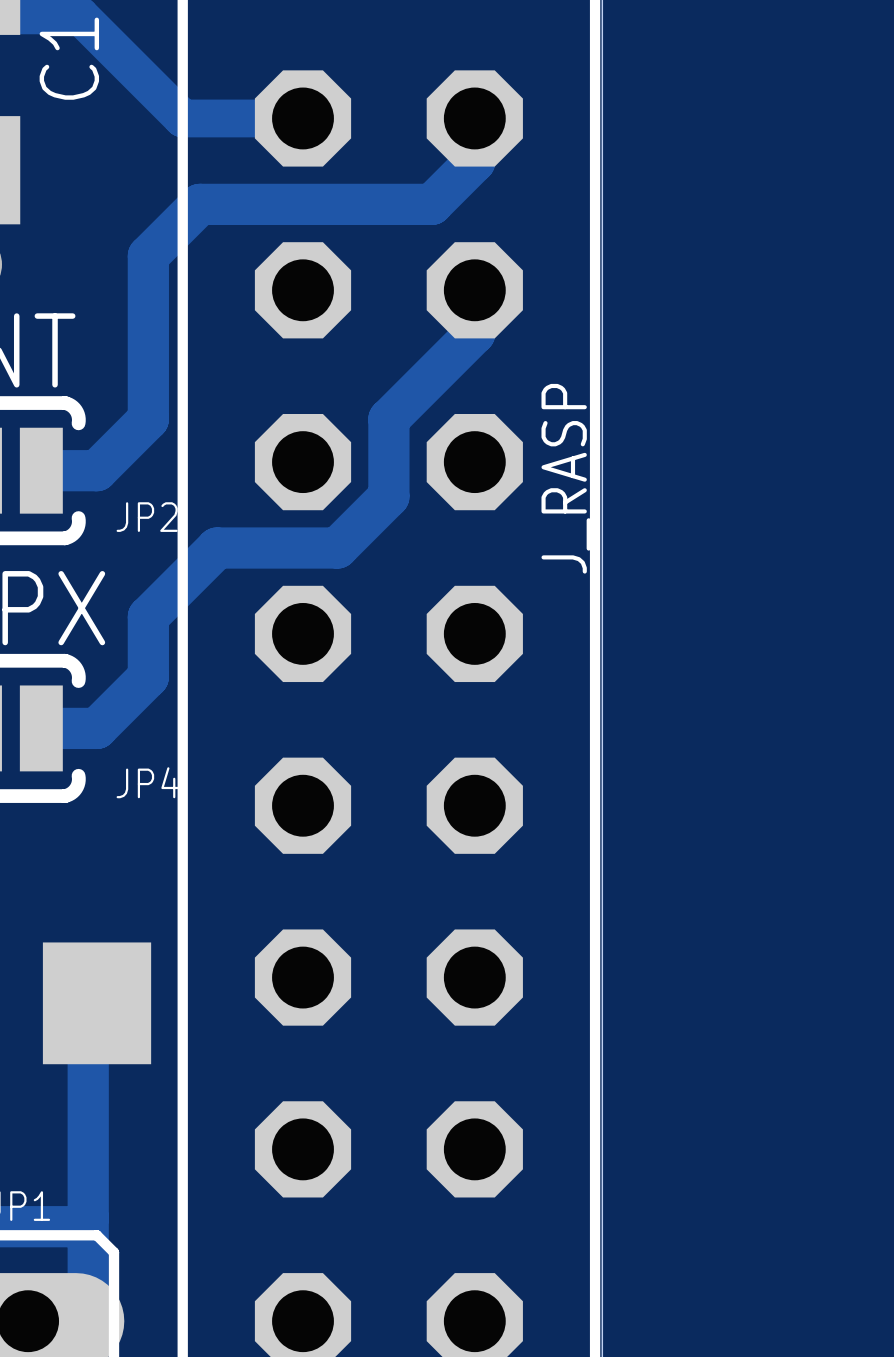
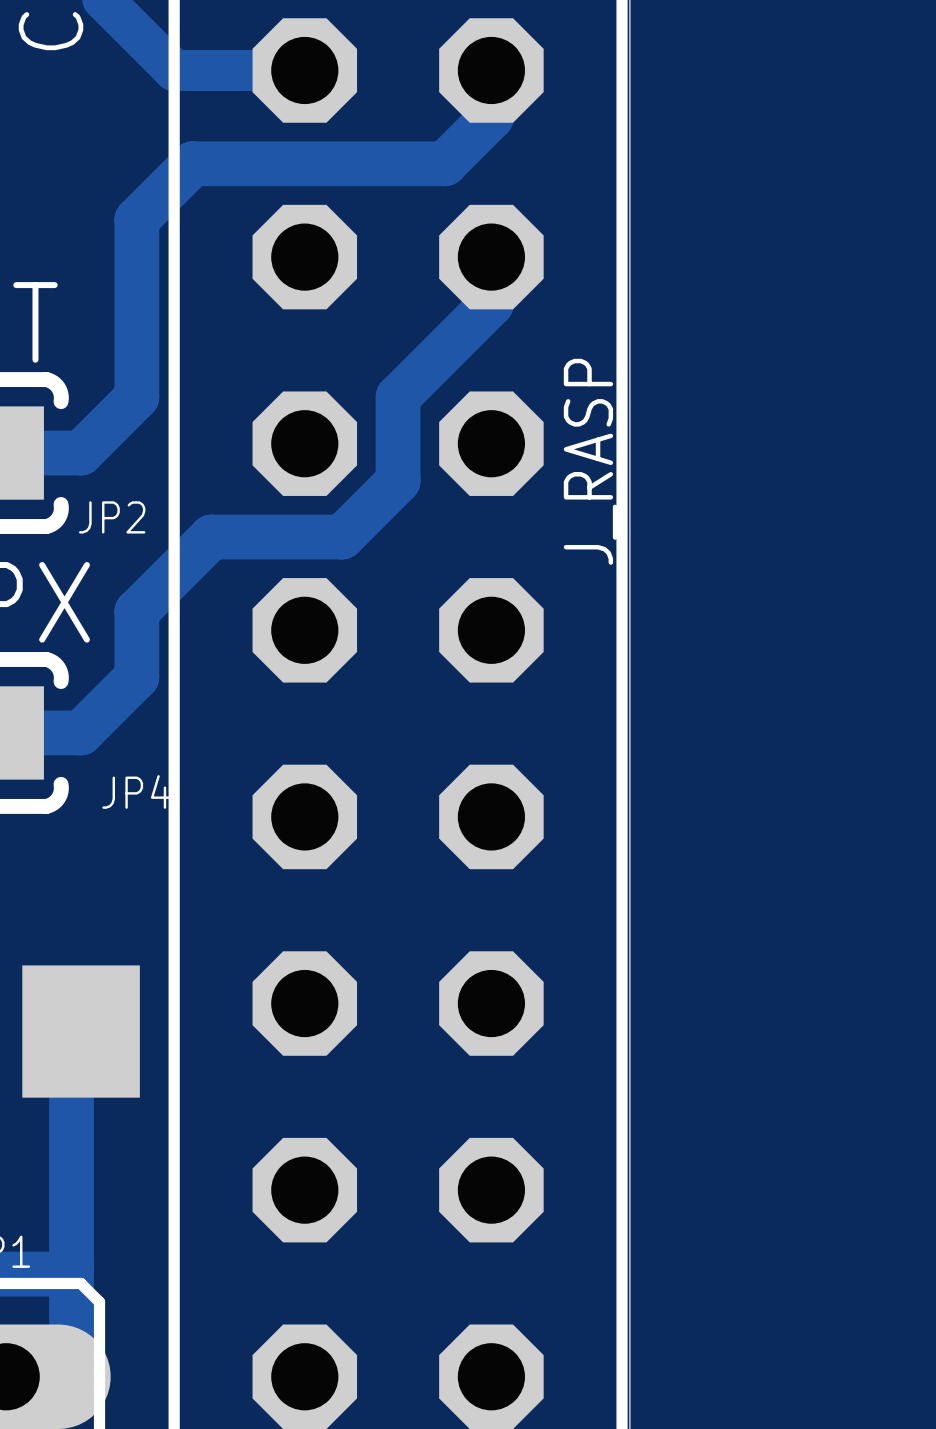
JP2 name position: JP2 (147, 517) -> JP2 (112, 517)

